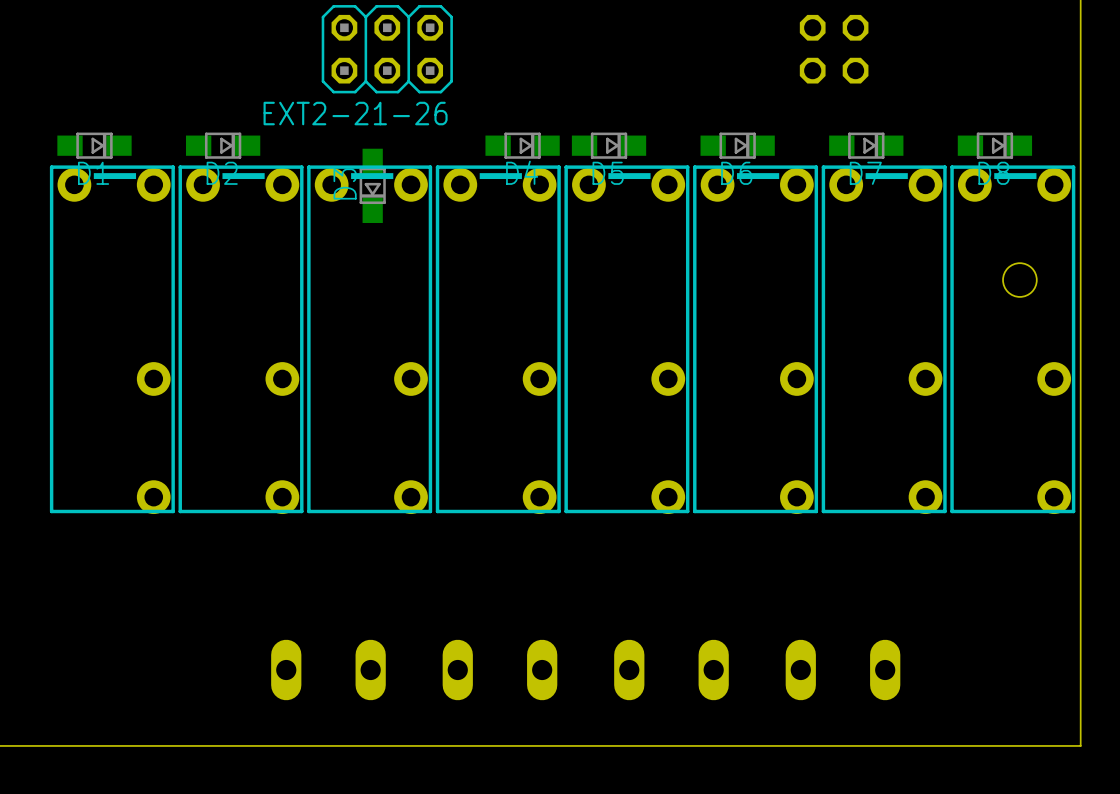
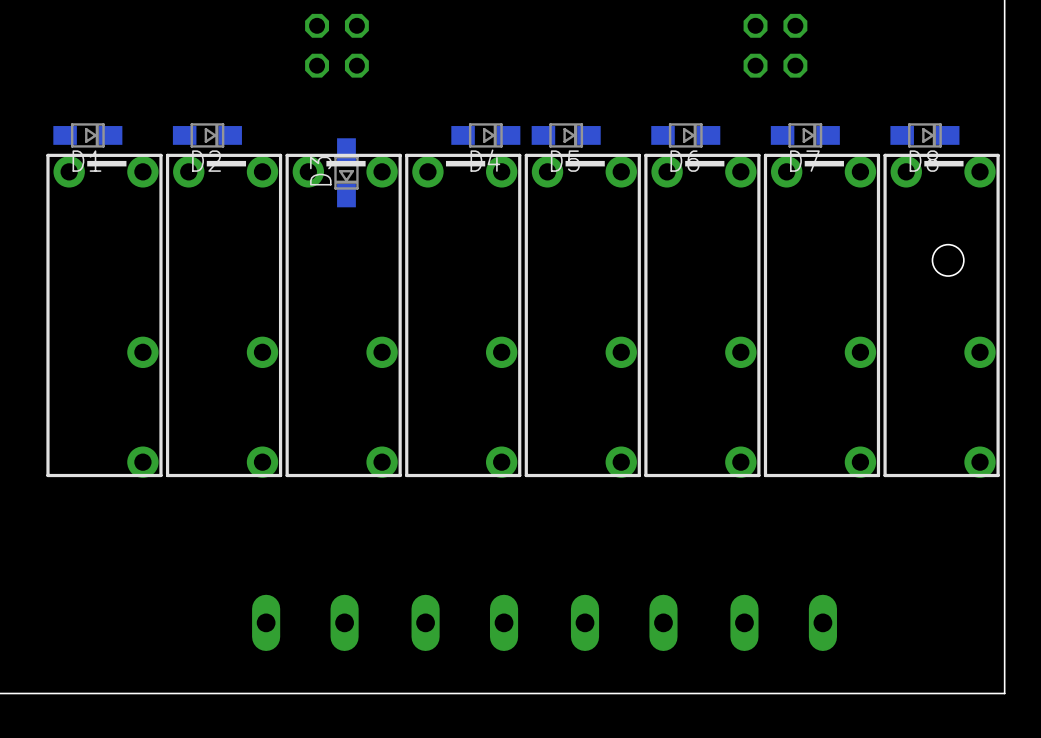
part: none -> (336, 45)
EXT2-21-26: (387, 49) -> none

